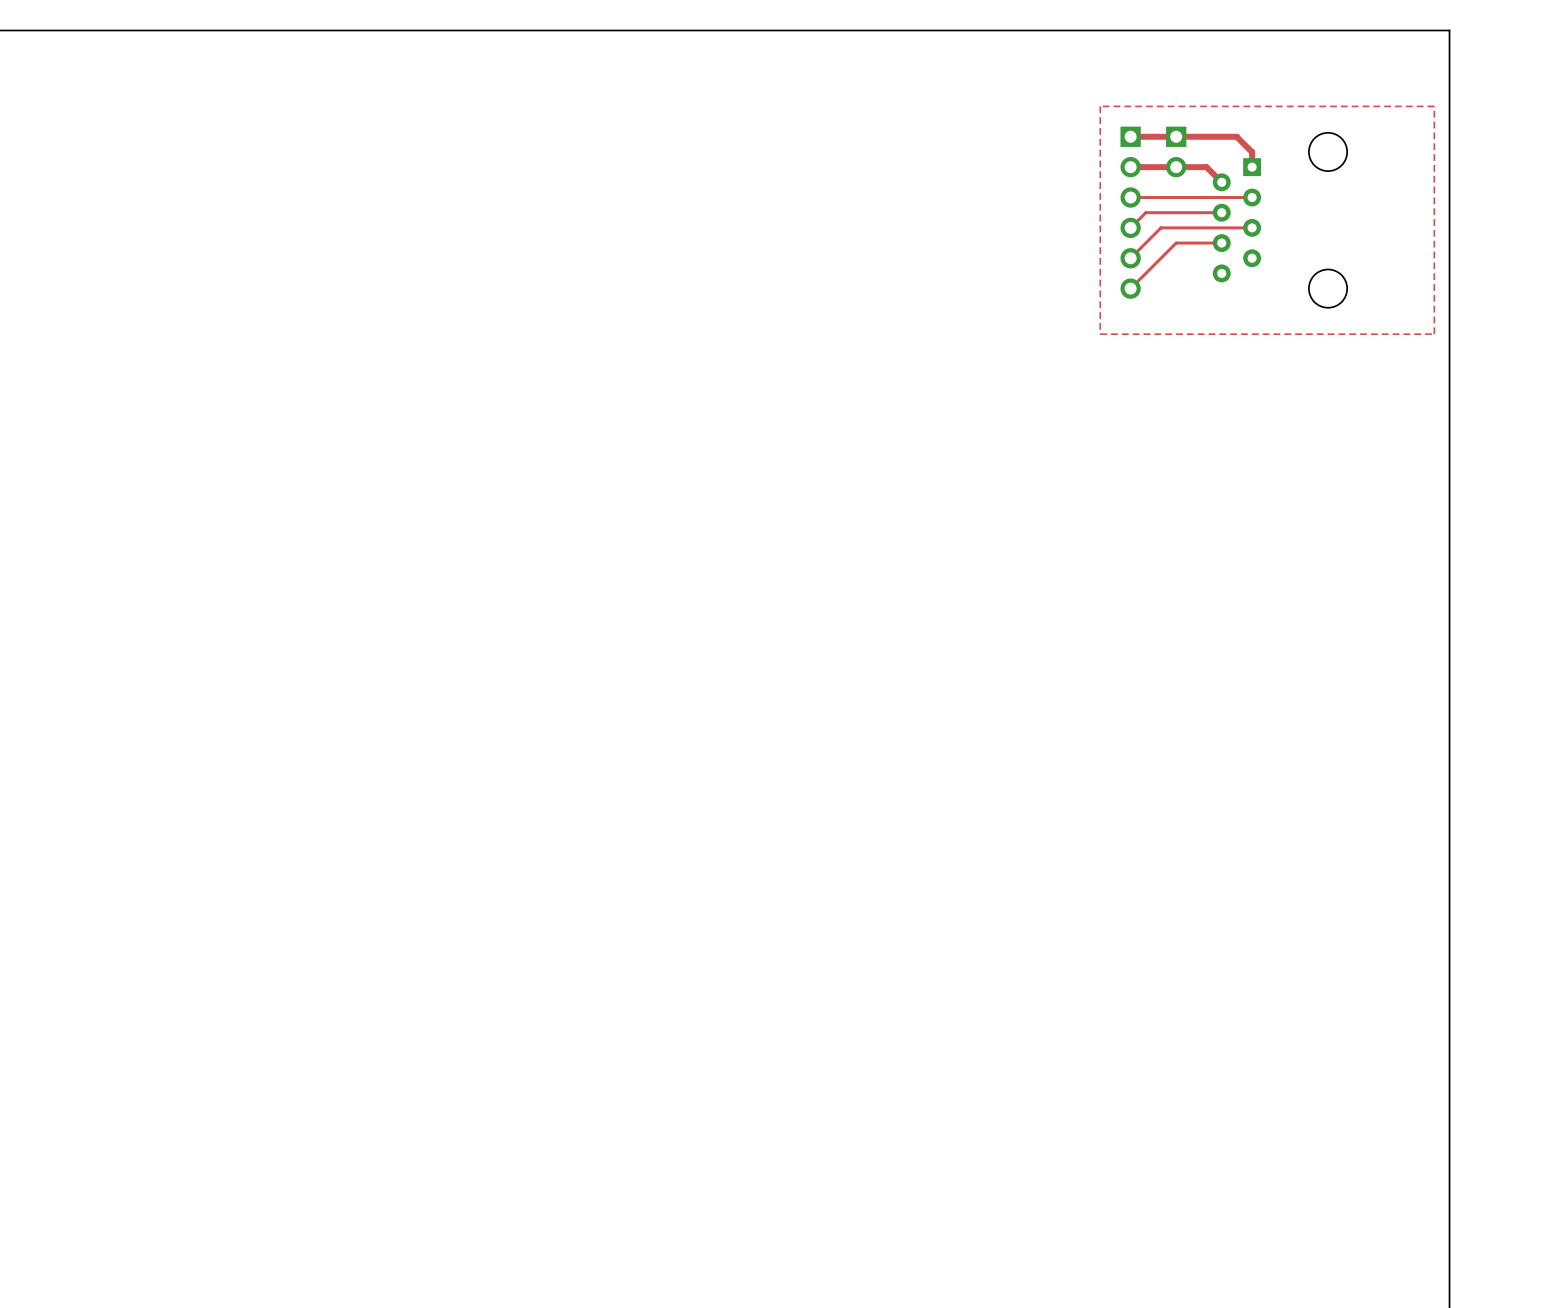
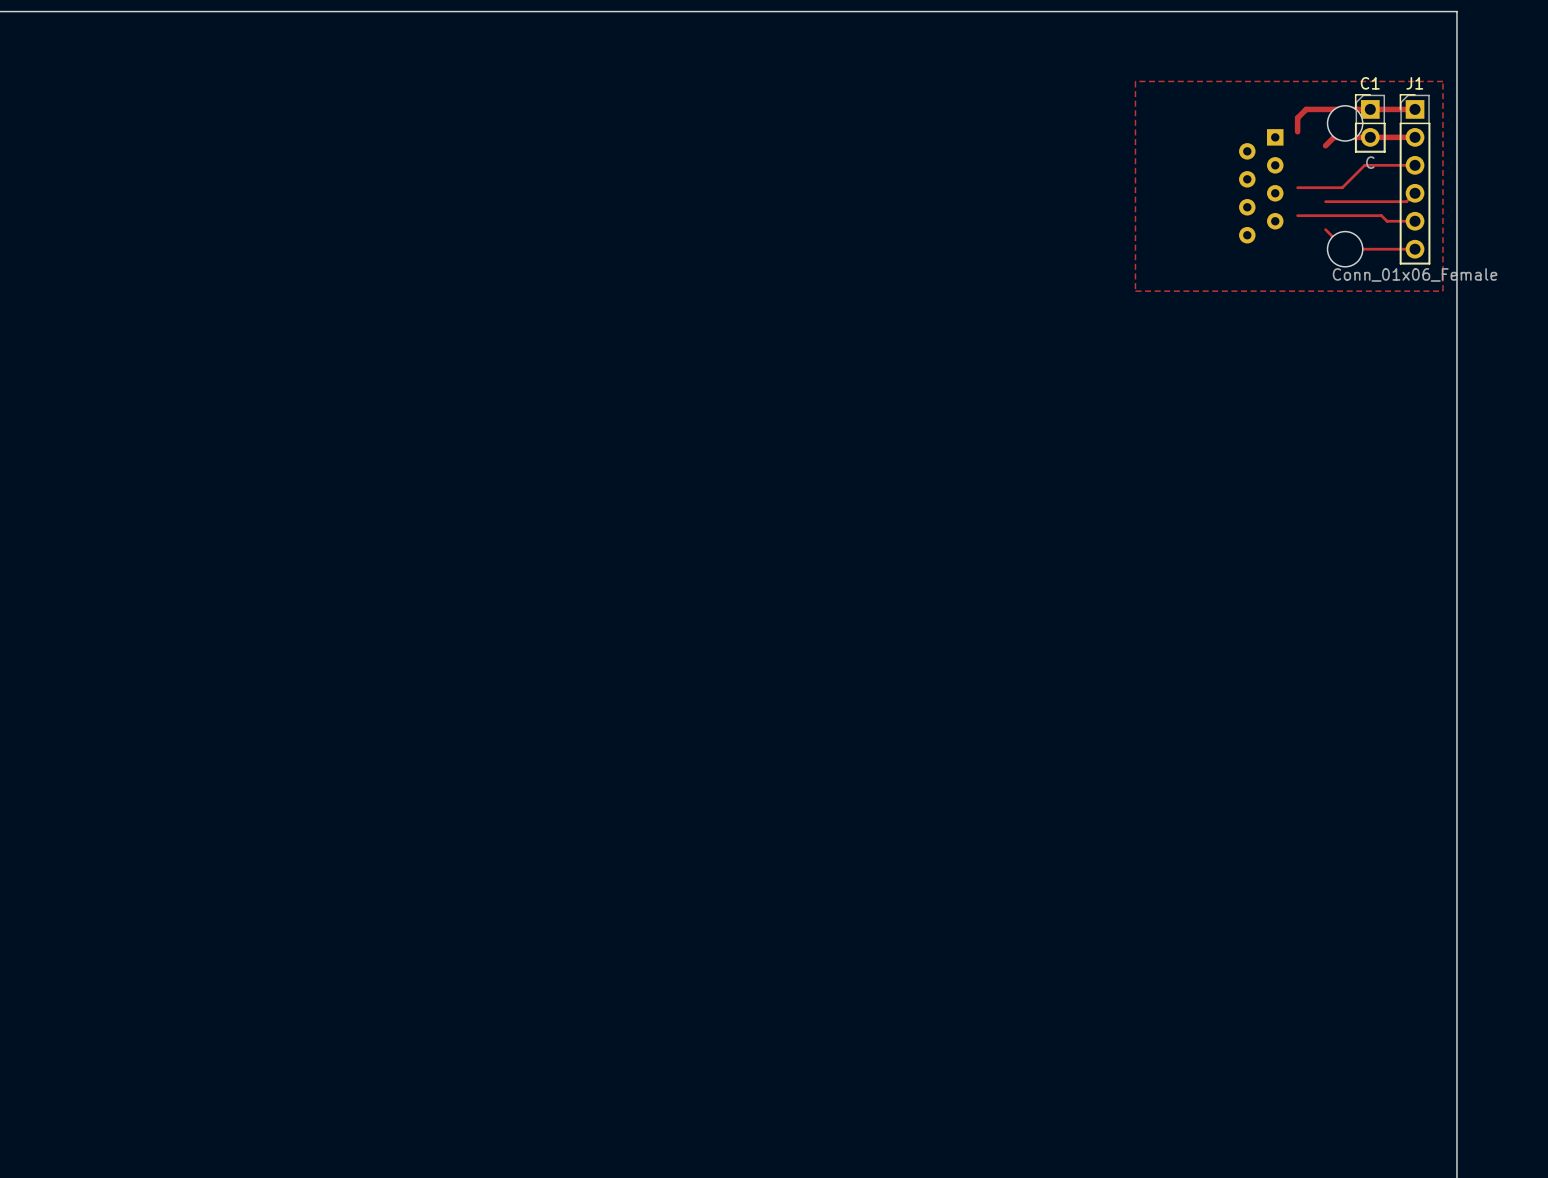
top track: (1130, 136) (1236, 136) (1252, 152) (1252, 167) -> none
top track: none -> (1415, 109) (1306, 109) (1297, 118) (1297, 131)
C1 side: top (1176, 151) -> bottom (1370, 123)
top track: (1130, 167) (1206, 167) (1221, 182) -> none
top track: none -> (1415, 137) (1333, 137) (1325, 145)
top track: (1252, 197) (1130, 197) -> none
top track: none -> (1415, 165) (1364, 165) (1342, 187) (1297, 187)
J1 side: top (1130, 212) -> bottom (1415, 179)
top track: (1221, 212) (1145, 212) (1130, 227) -> none
top track: (1252, 227) (1161, 227) (1130, 258) -> none
top track: none -> (1415, 193) (1406, 201) (1325, 201)
top track: (1221, 243) (1176, 243) (1130, 288) -> none
top track: none -> (1409, 215) (1415, 221) (1387, 221) (1381, 215) (1297, 215)
top track: none -> (1325, 229) (1345, 249) (1415, 249)

